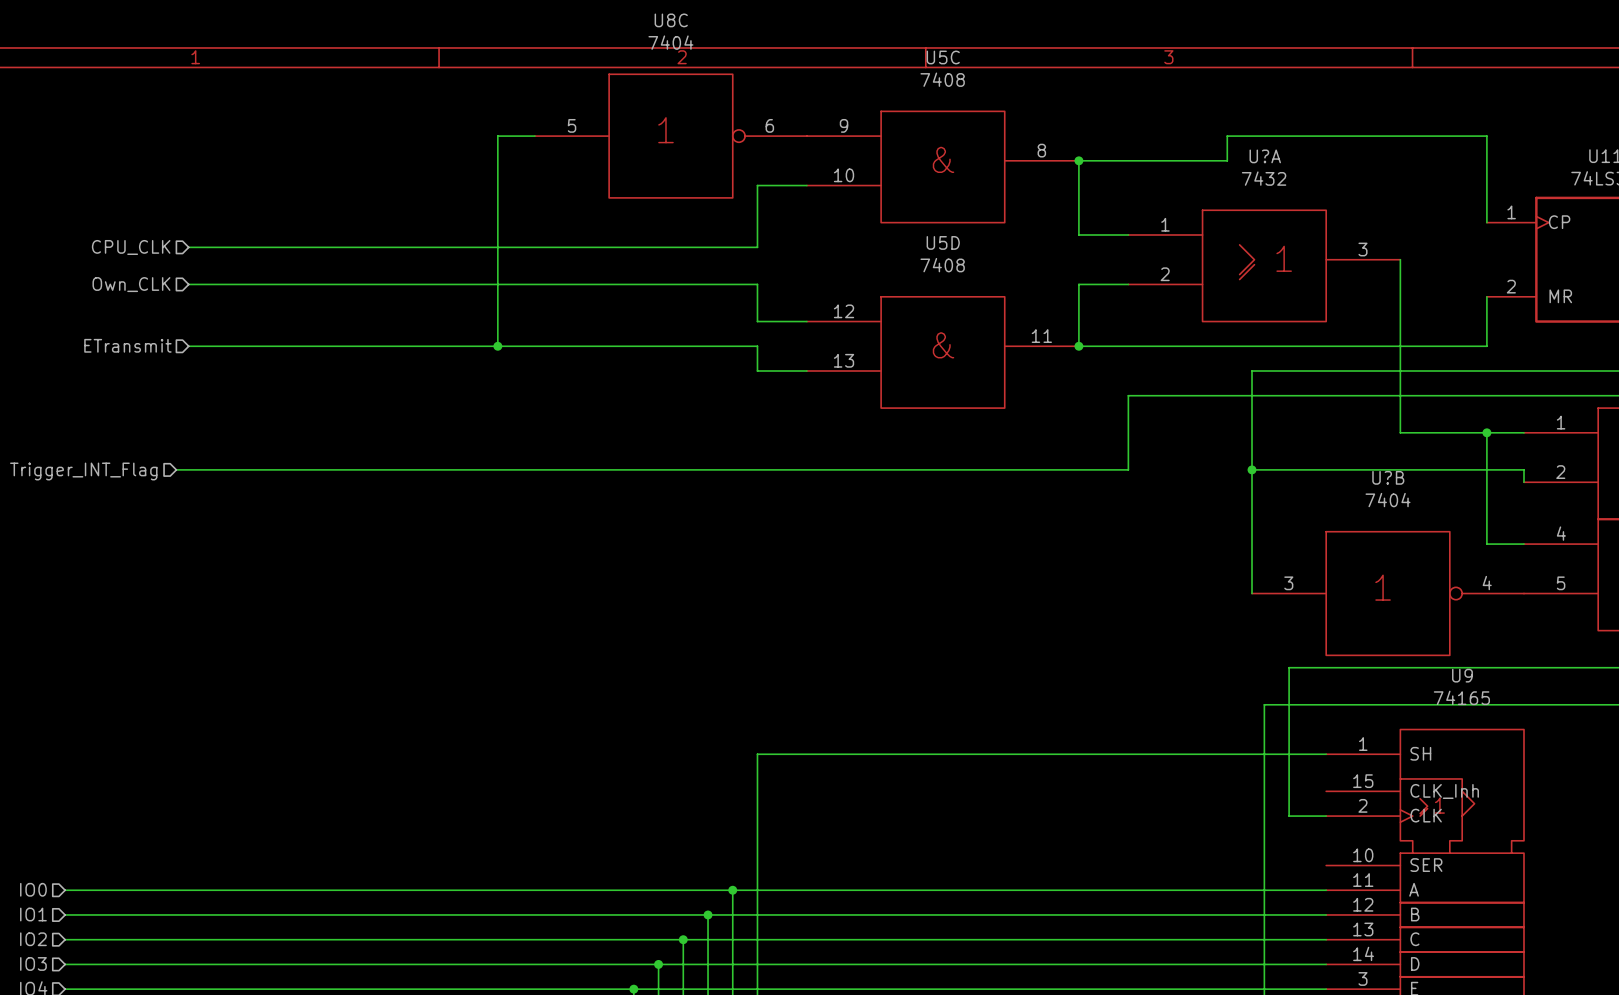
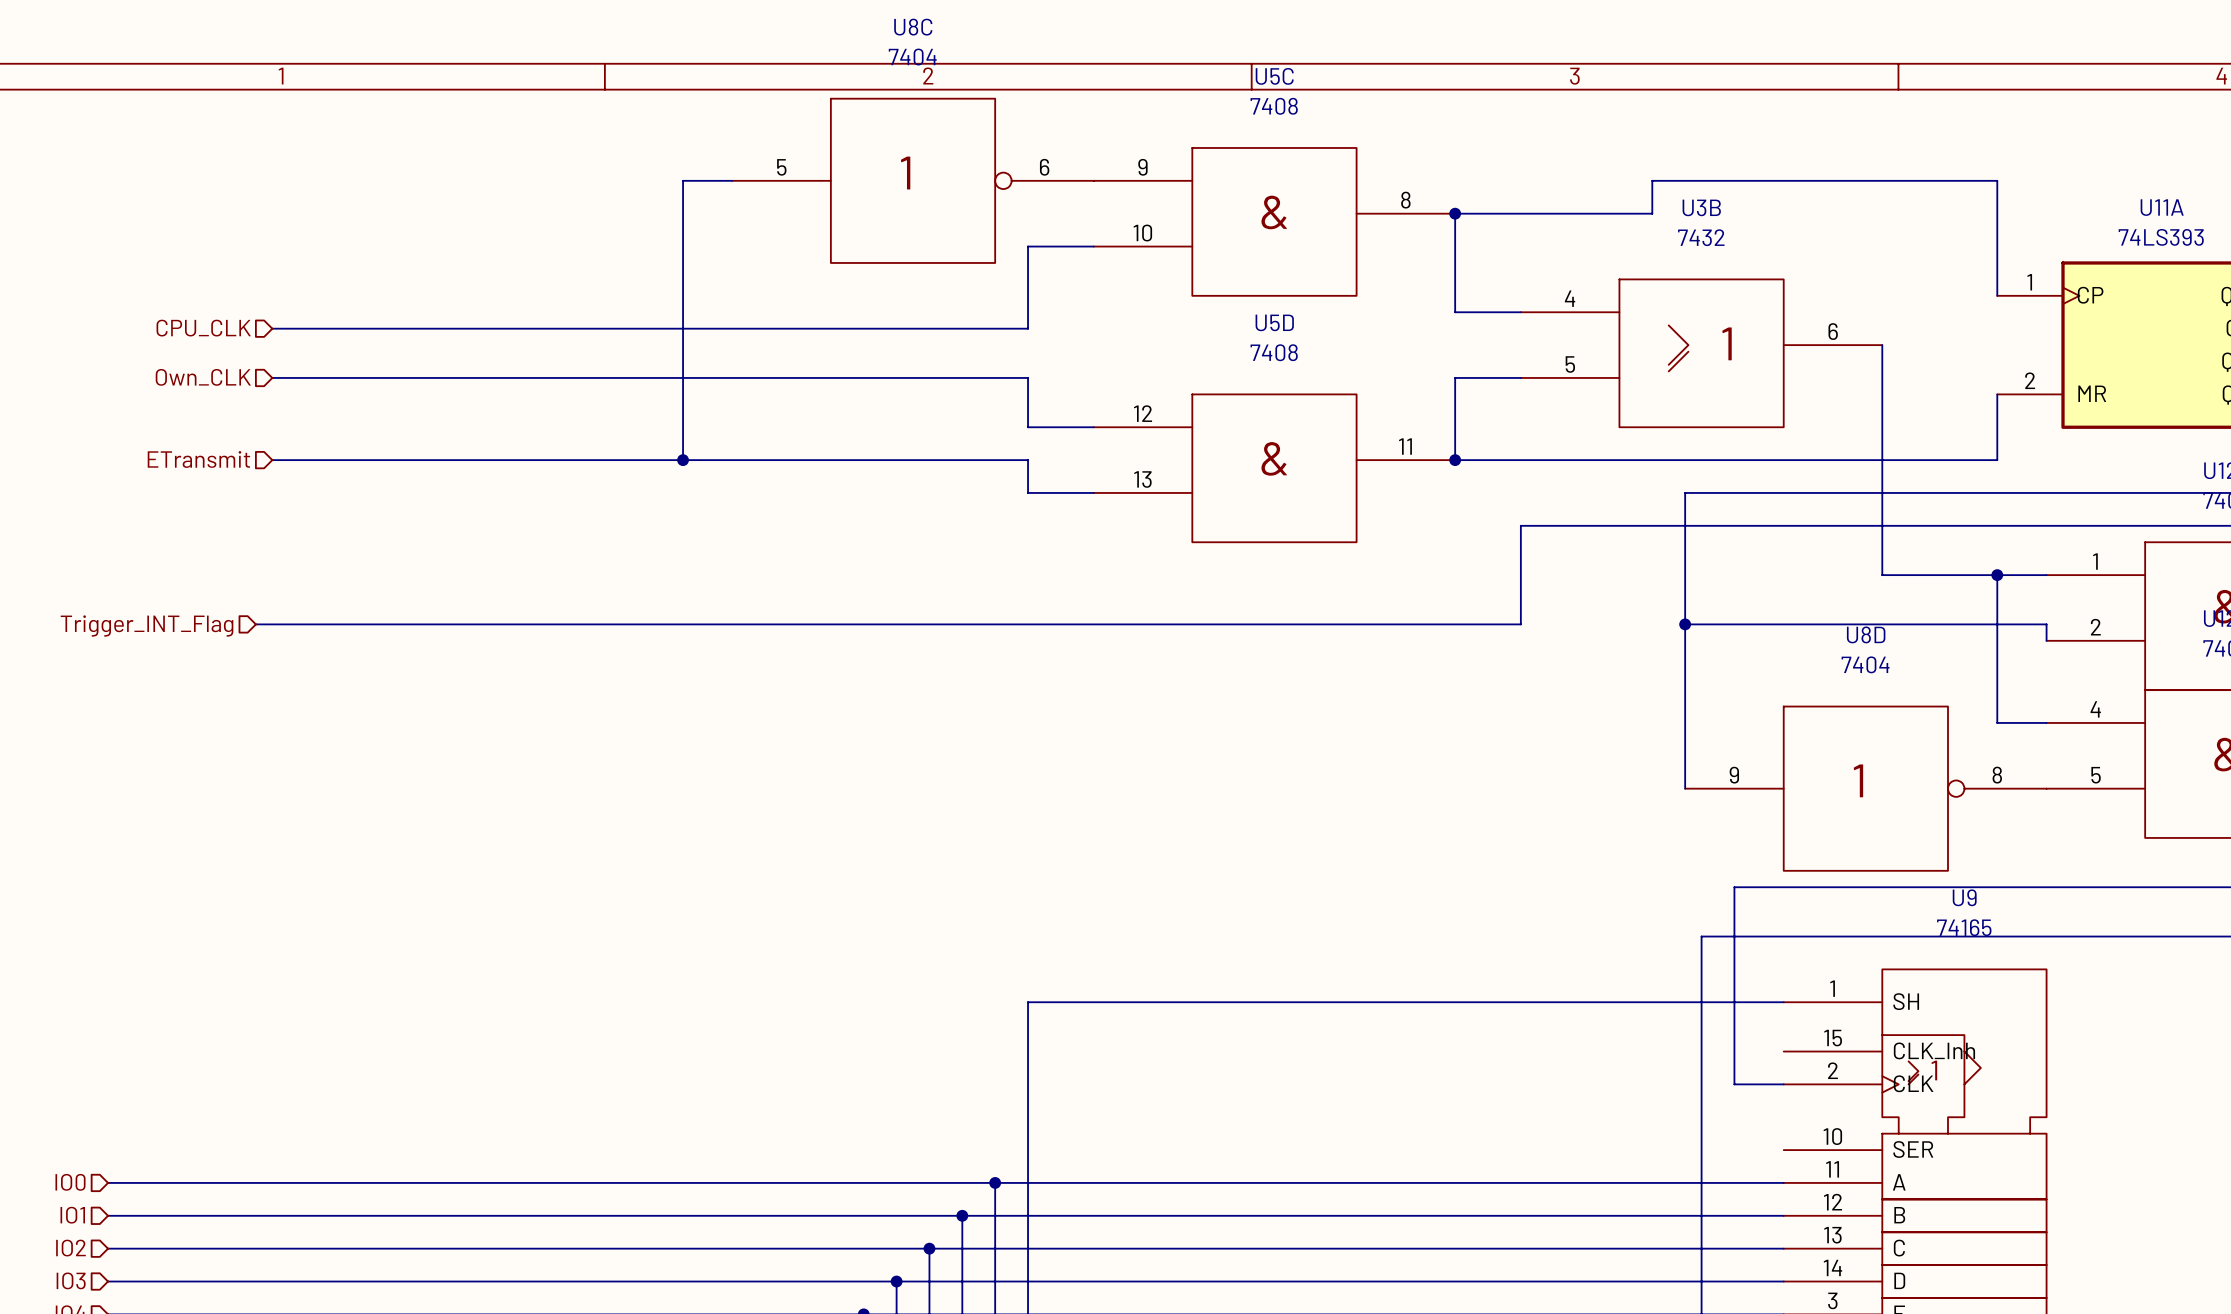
U?A name: U?A (1265, 156) -> U3B (1701, 207)
U?A pin number: 1 (1165, 224) -> 4 (1570, 298)
U?A pin number: 3 (1362, 249) -> 6 (1833, 331)
U?A pin number: 2 (1165, 274) -> 5 (1570, 364)
U?B name: U?B (1388, 477) -> U8D (1866, 634)
U?B pin number: 3 (1288, 583) -> 9 (1734, 775)
U?B pin number: 4 (1487, 583) -> 8 (1997, 775)

